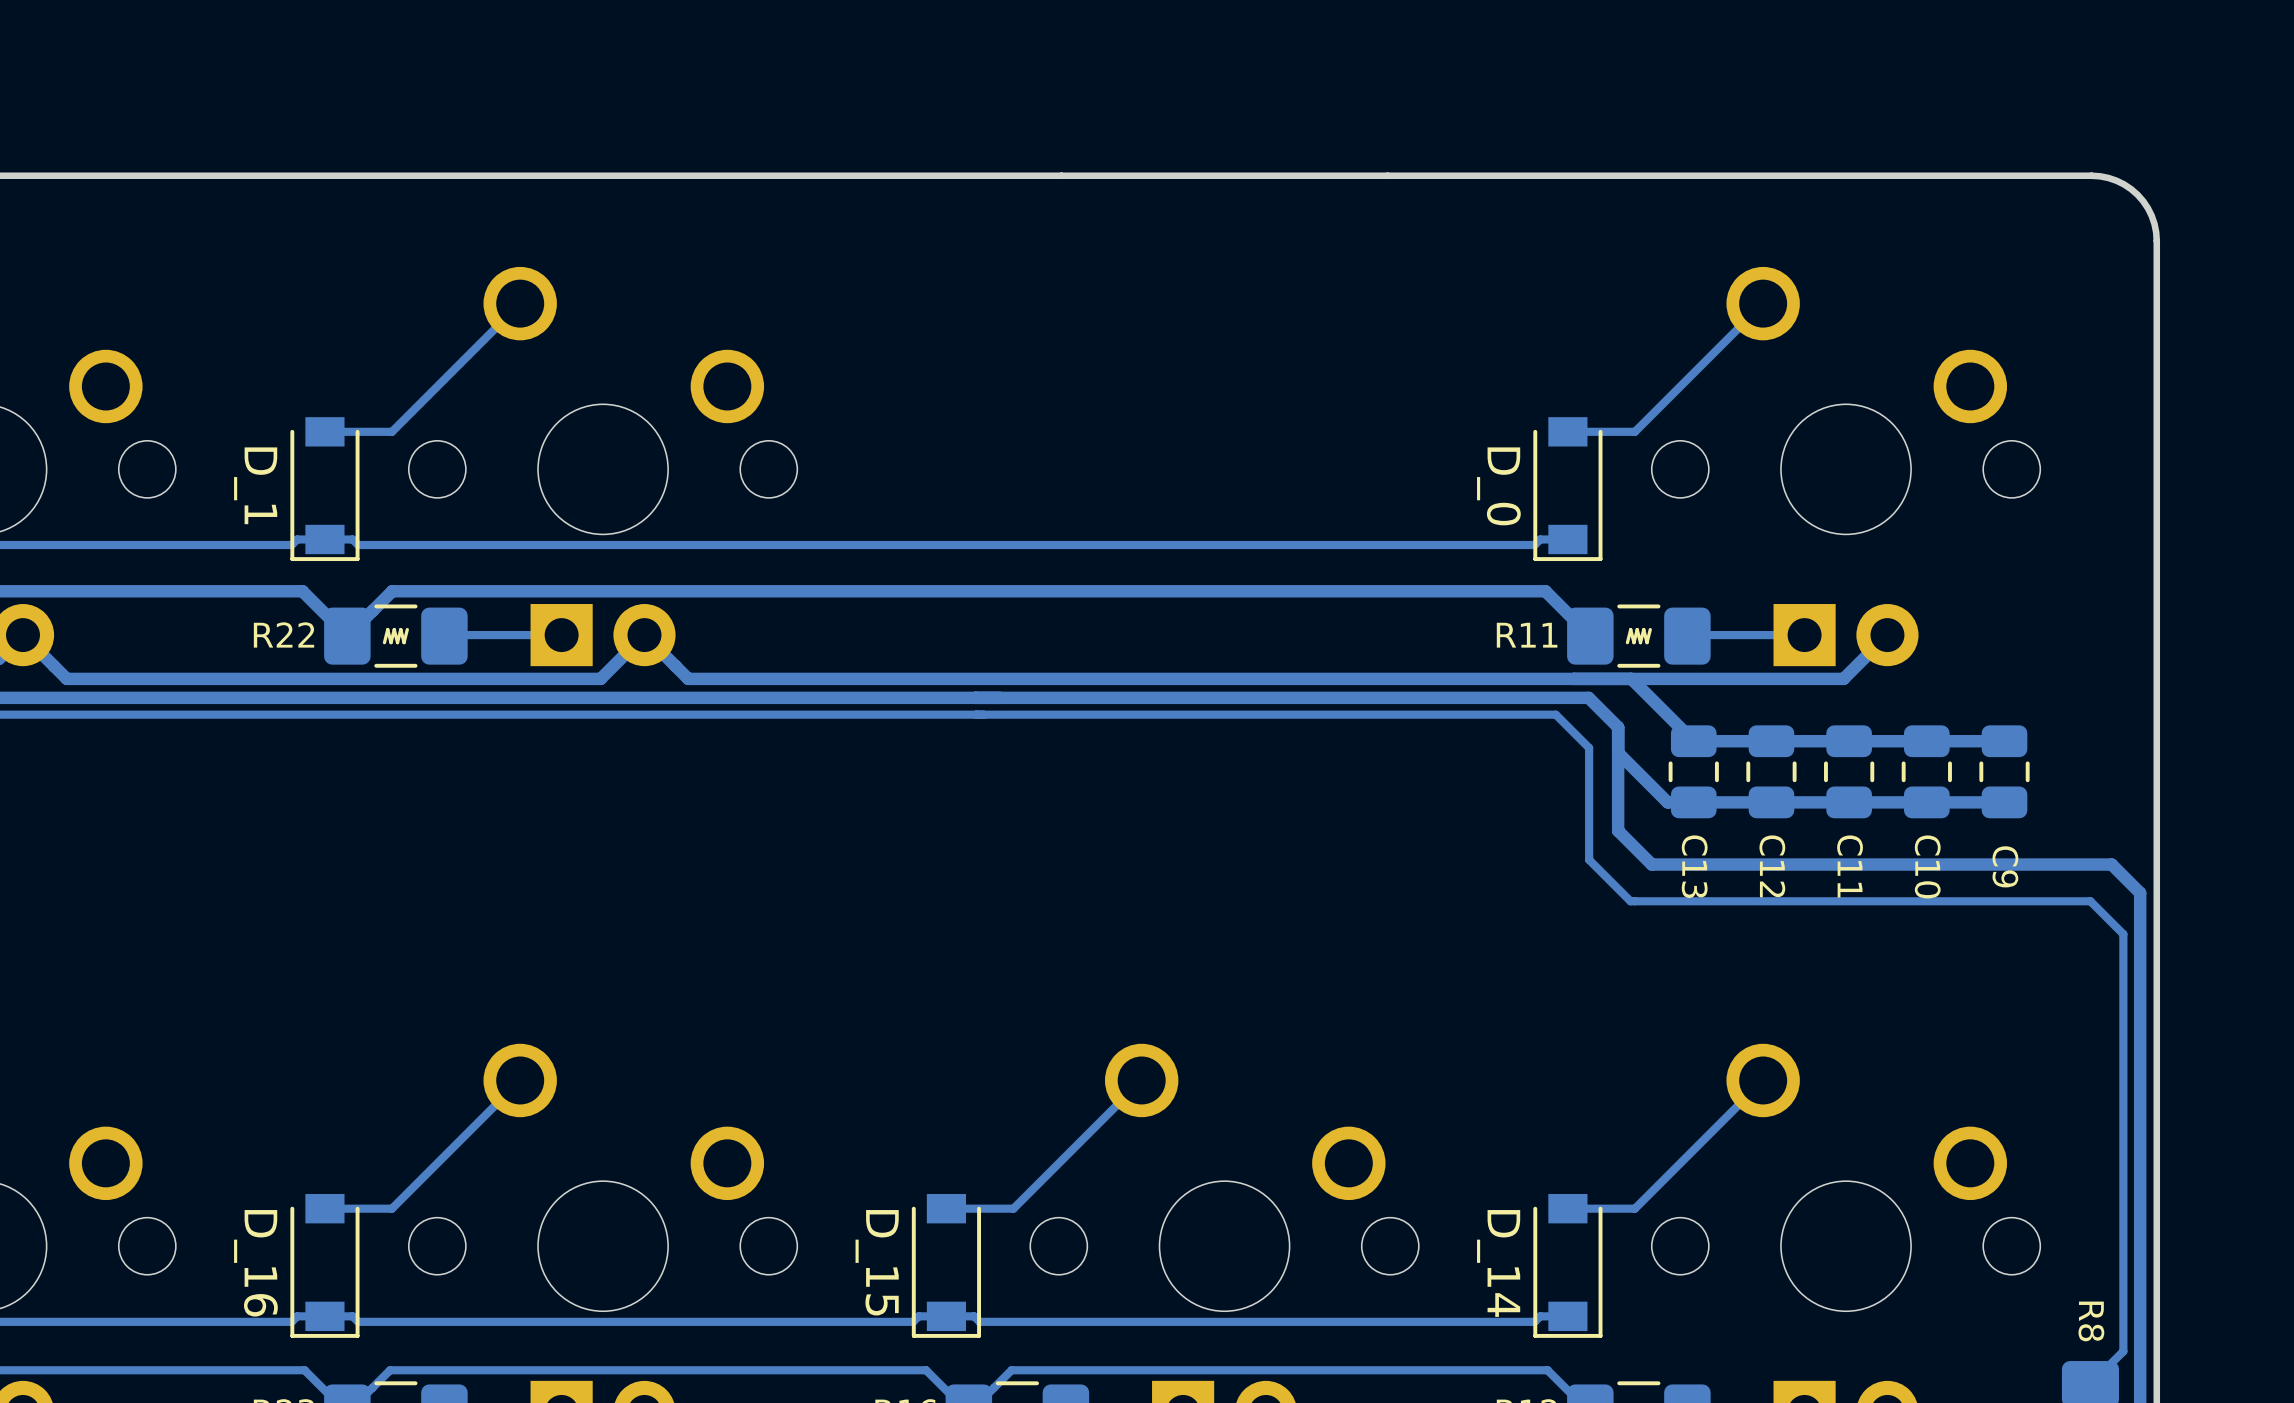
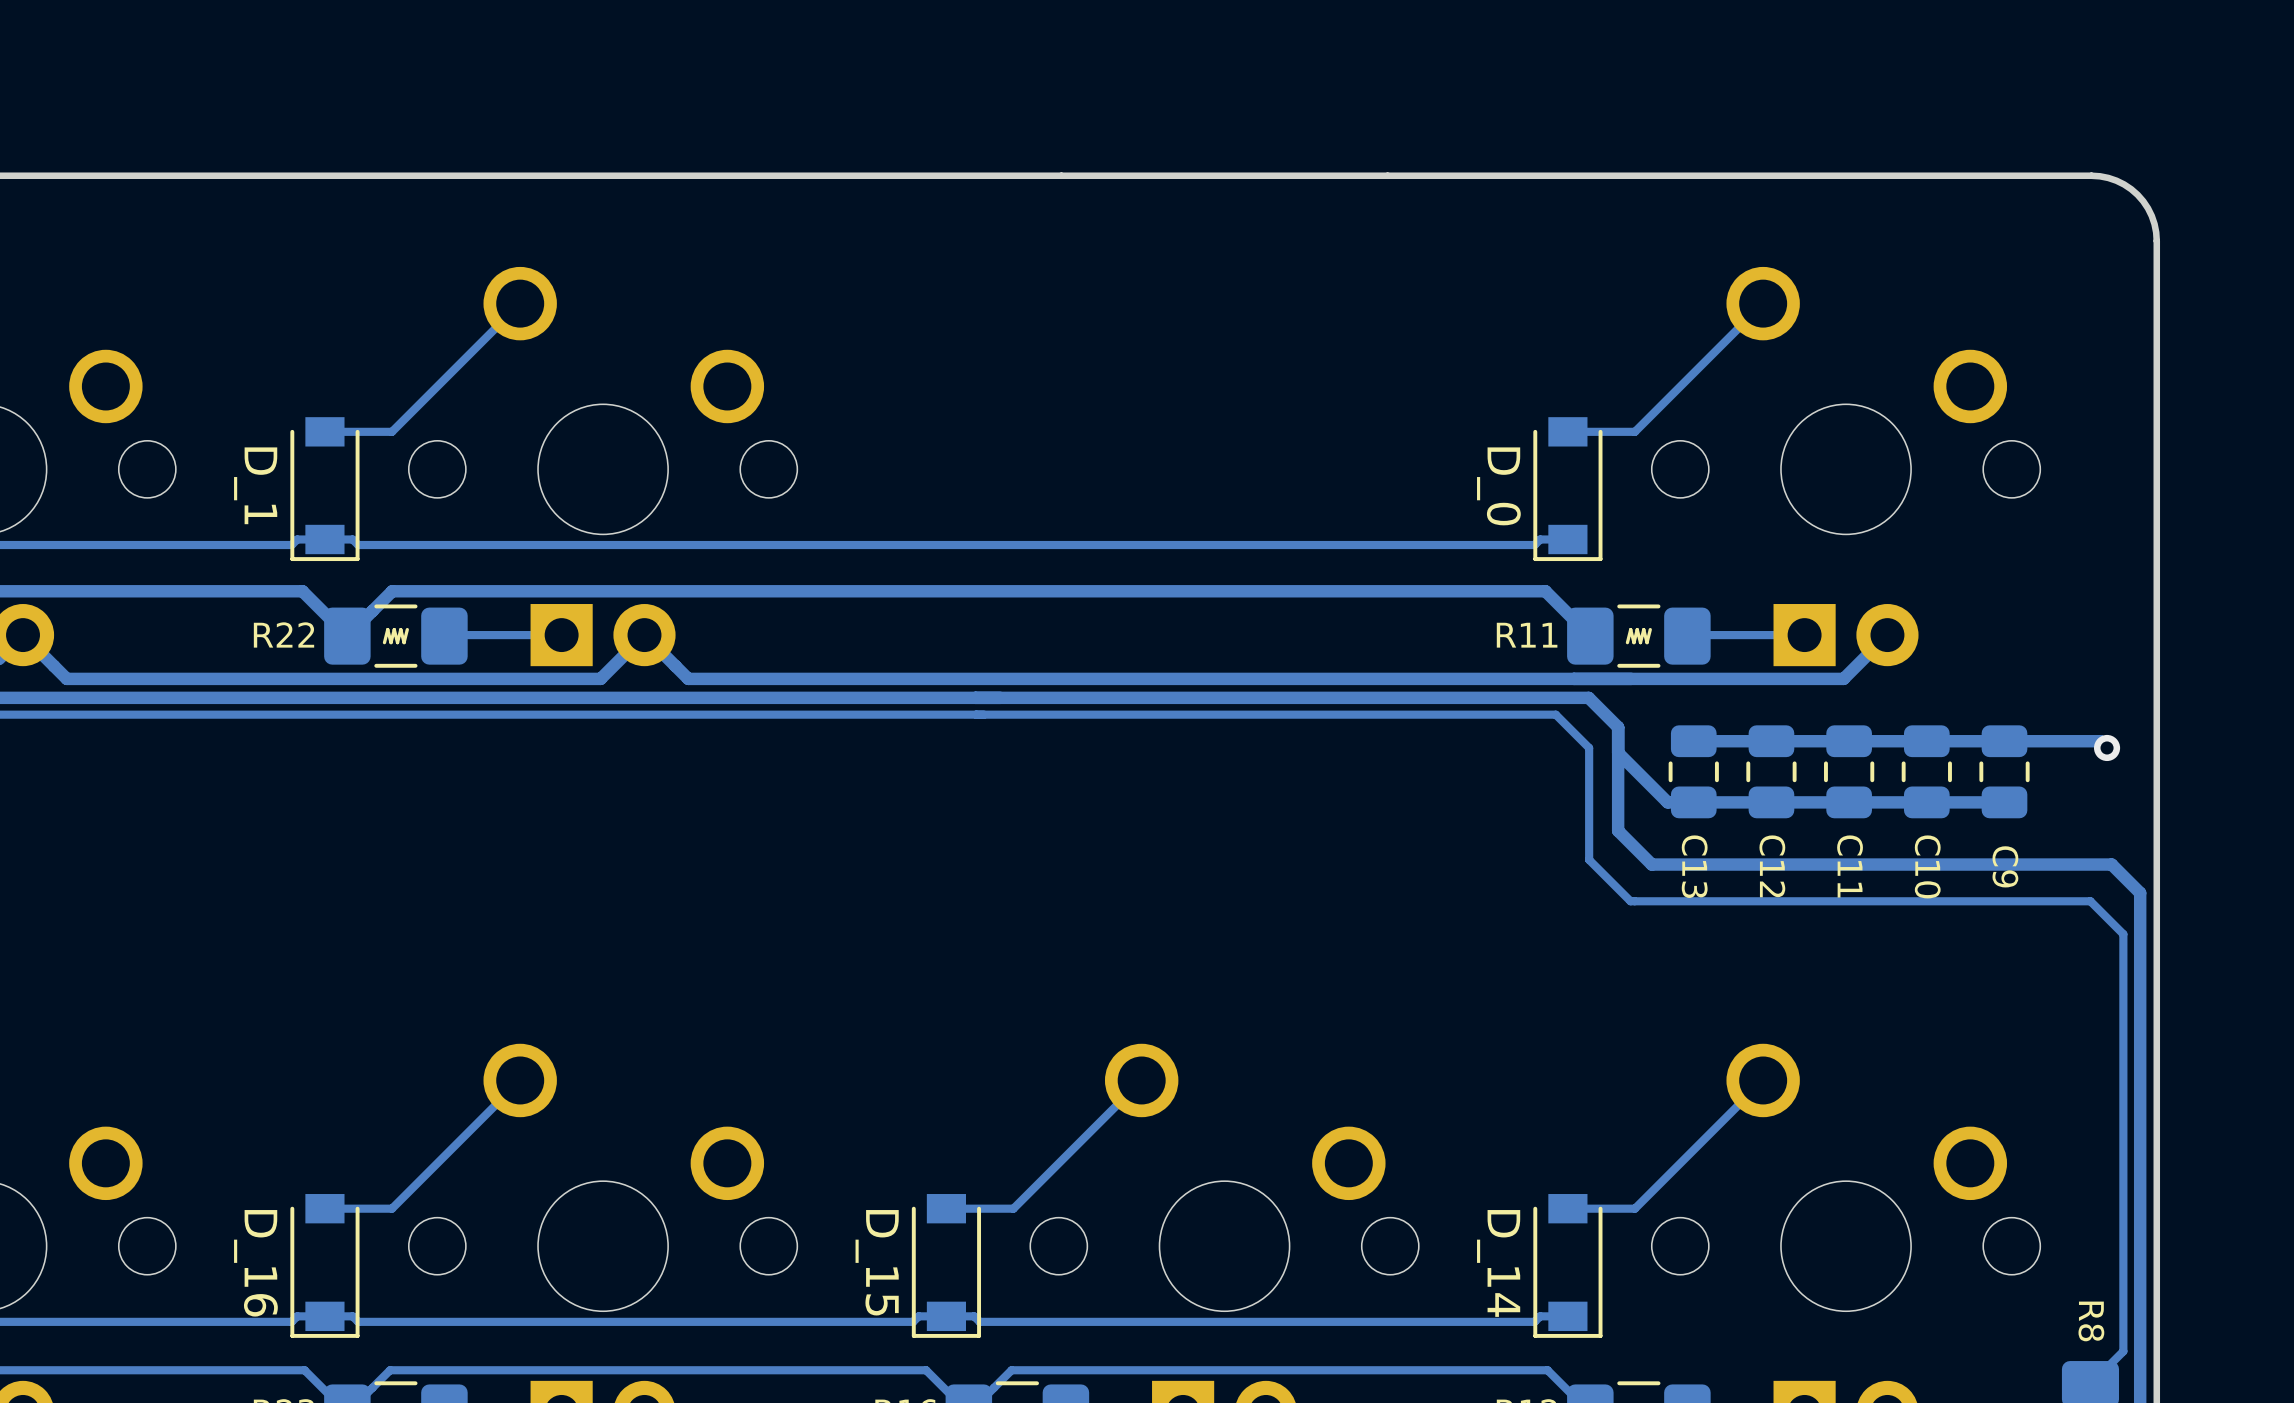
track: (1631, 678) (1693, 741) -> none
track: none -> (2004, 741) (2100, 741) (2107, 747)
via: none -> (2107, 747)

